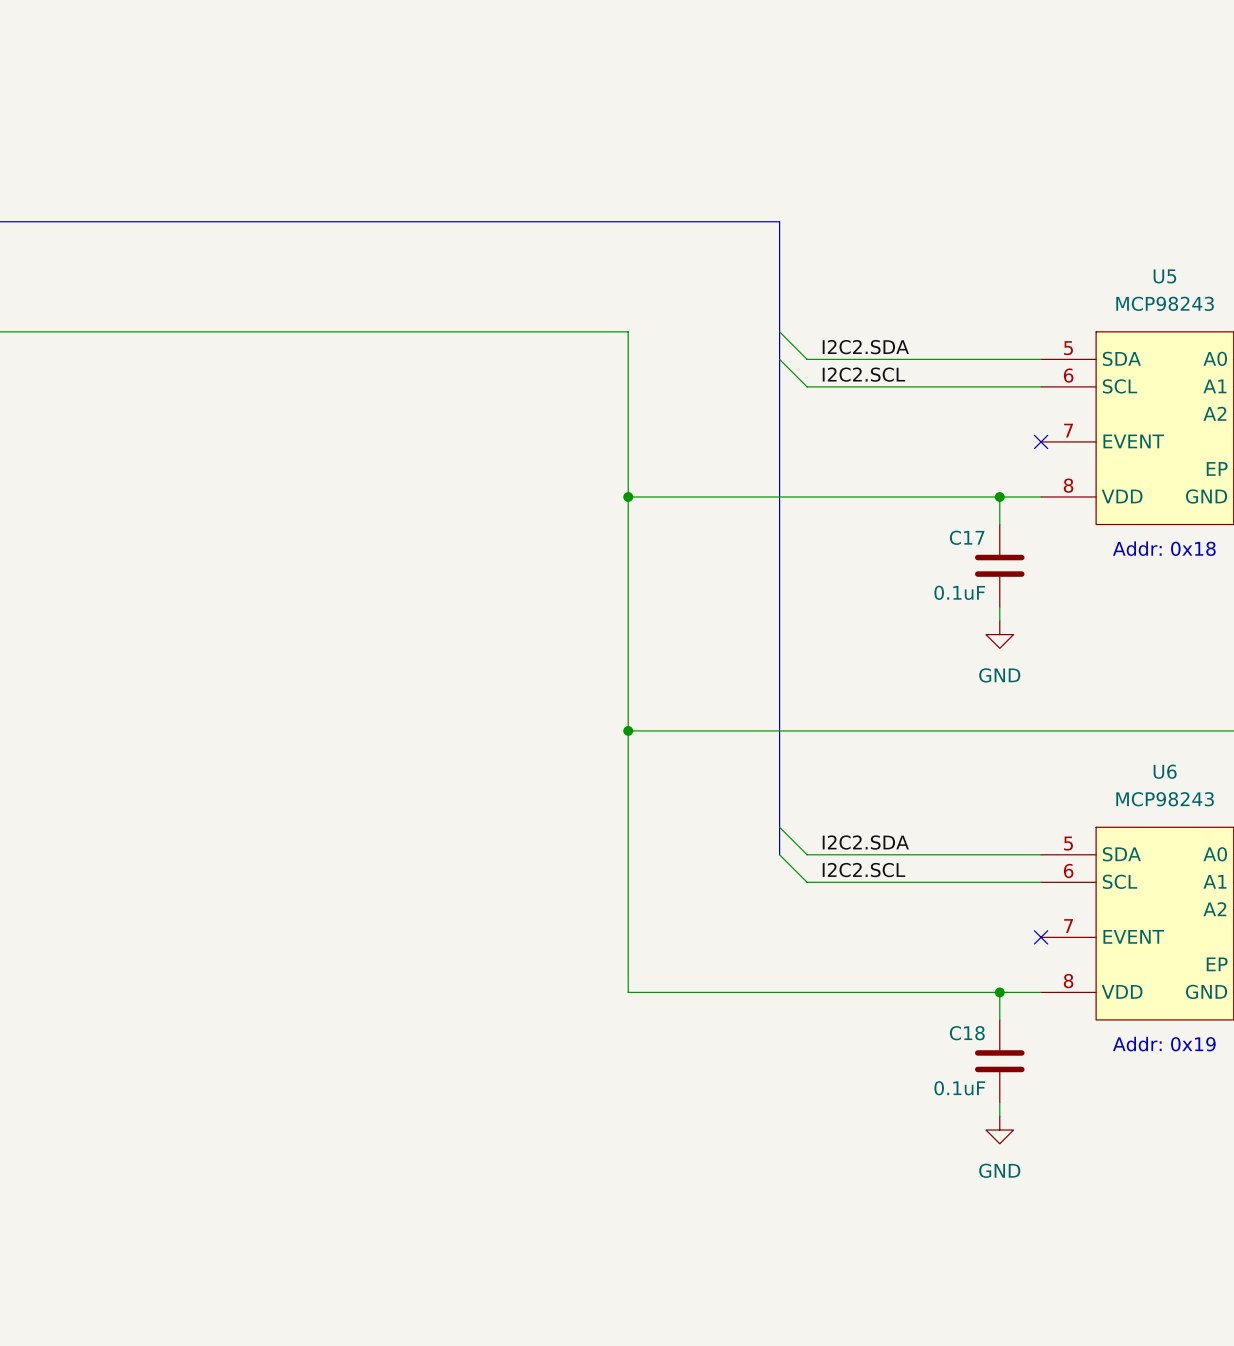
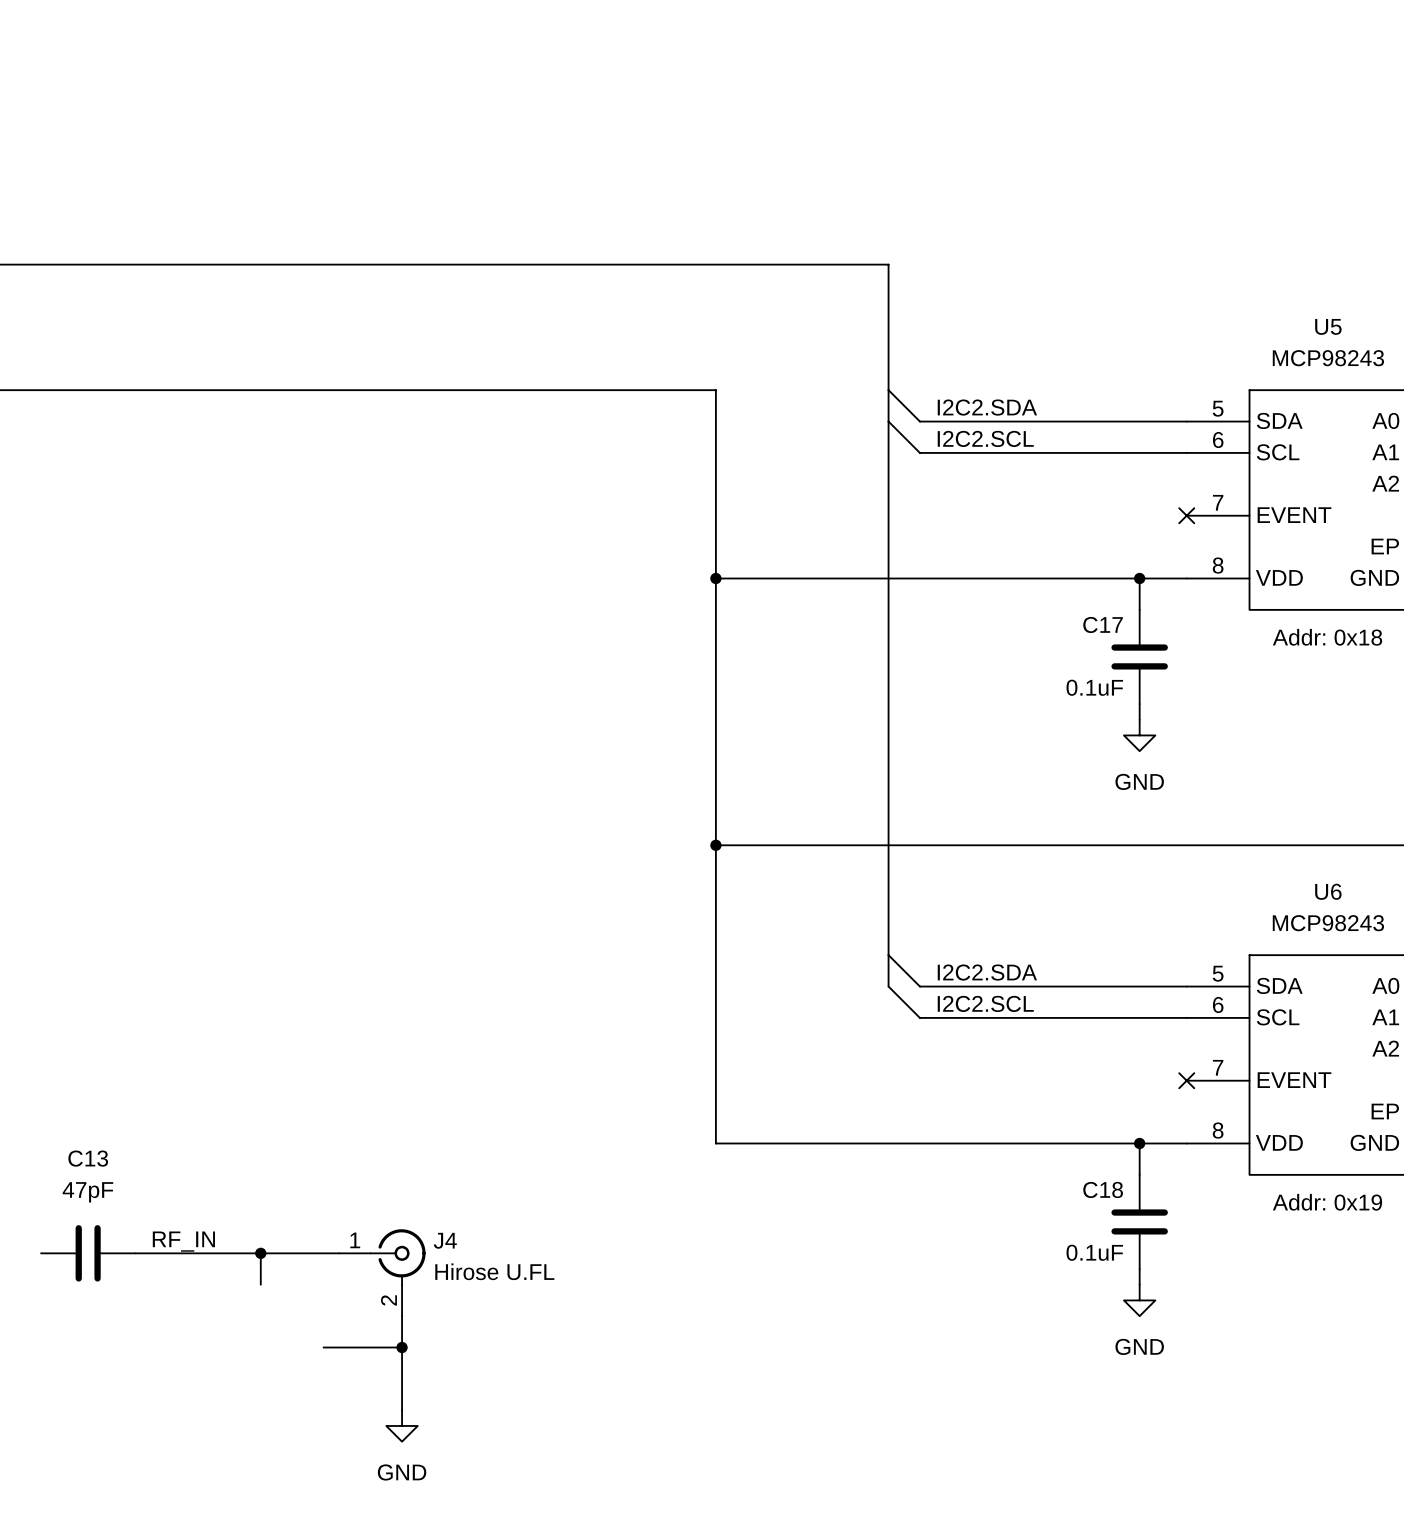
label: none -> RF_IN (183, 1241)
C13: none -> 47pF (88, 1253)
wire: none -> (135, 1253) (339, 1253)
wire: none -> (260, 1253) (260, 1284)
junction: none -> (260, 1253)
J4: none -> Hirose U.FL (382, 1272)
wire: none -> (402, 1316) (402, 1410)
wire: none -> (323, 1347) (402, 1347)
junction: none -> (402, 1347)
power symbol: none -> GND (402, 1425)

